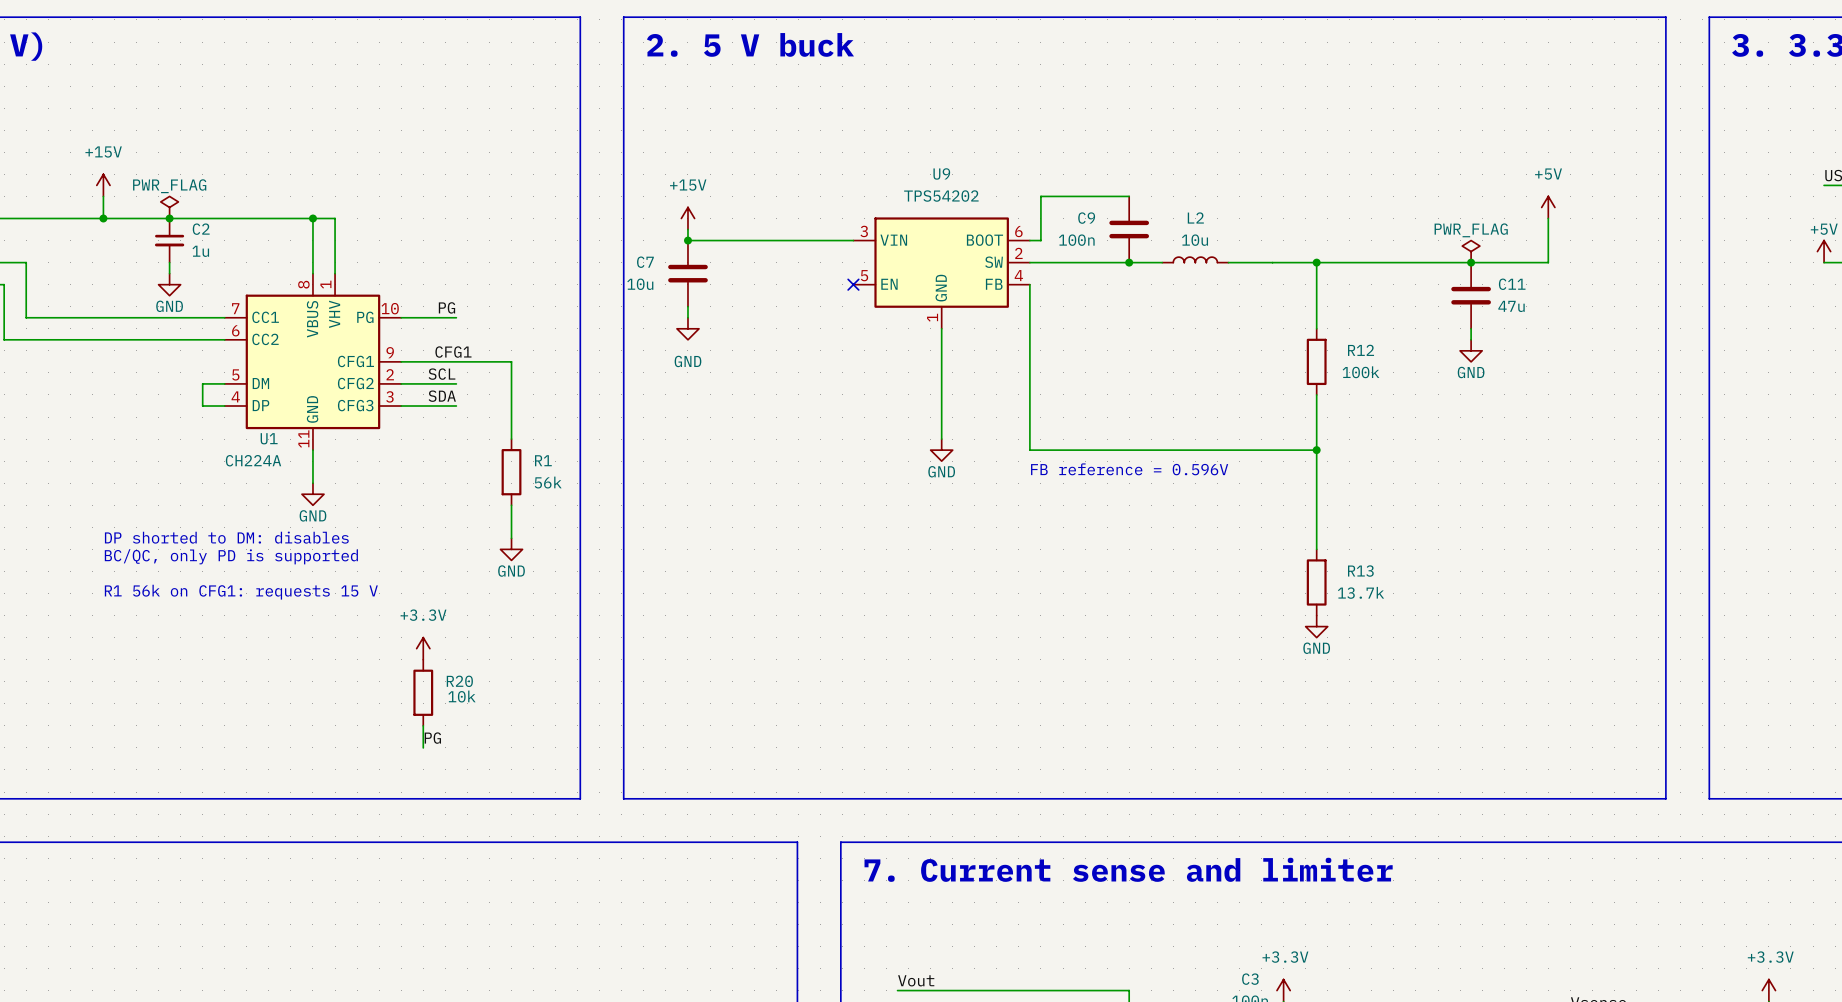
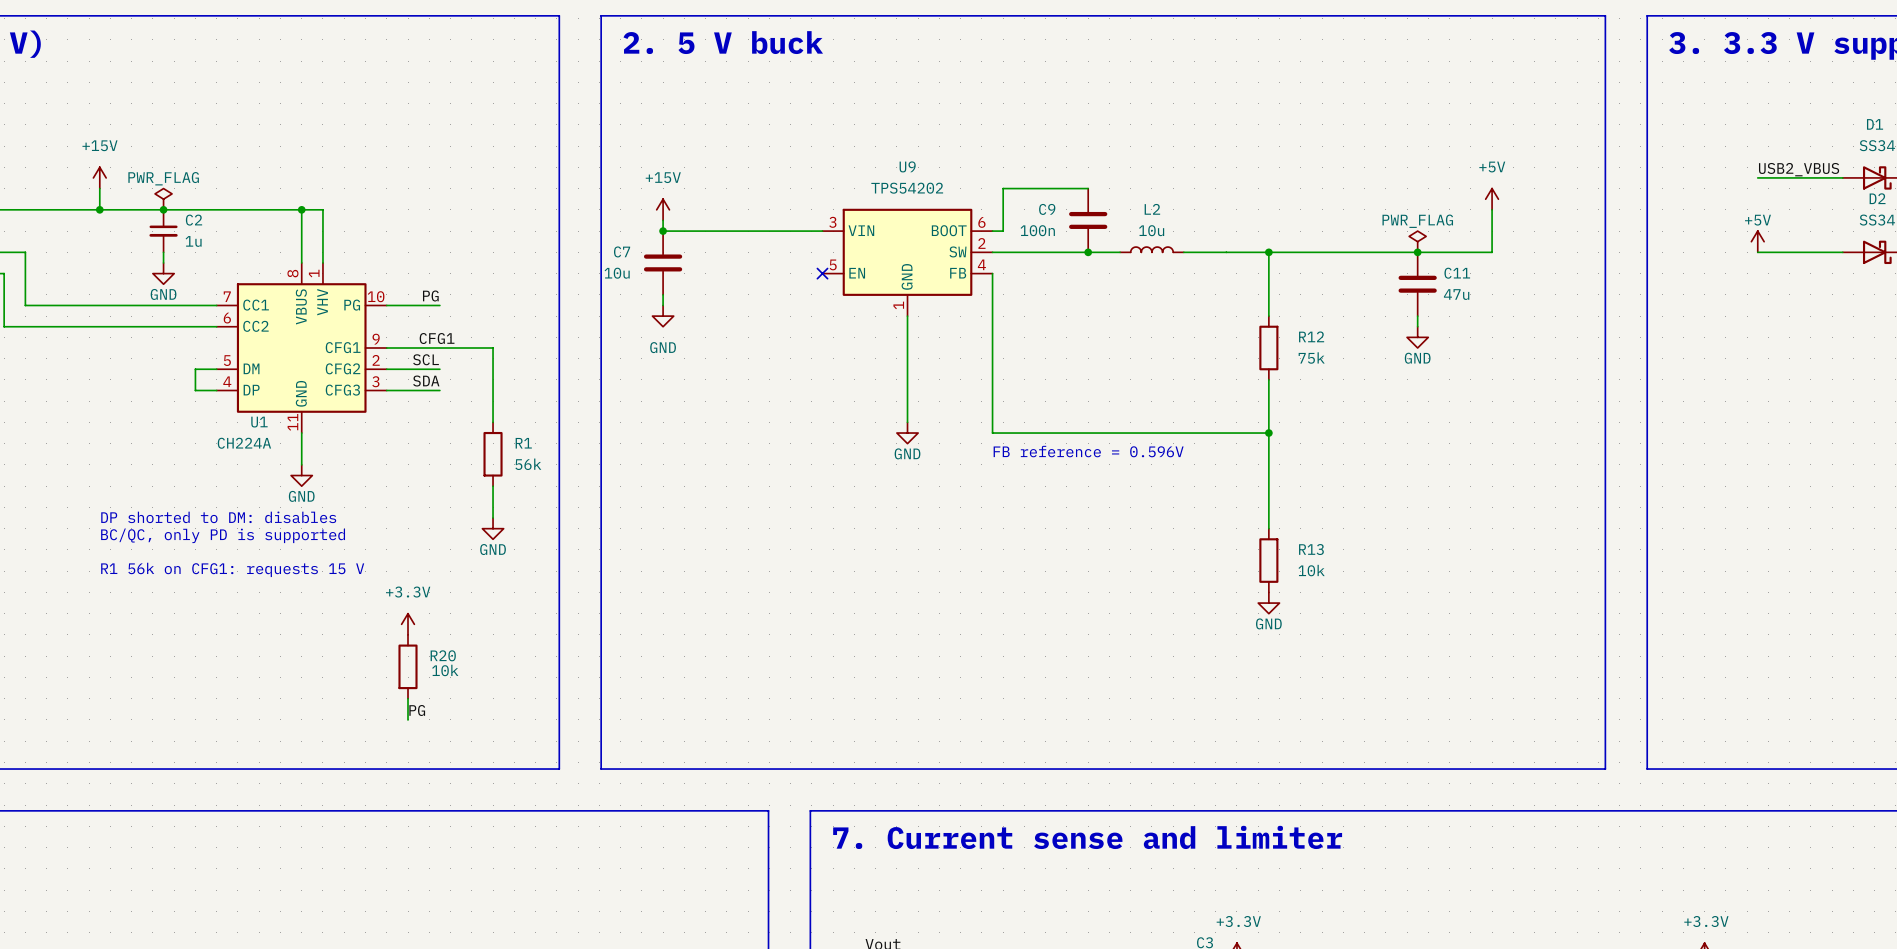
R12 value: 100k (1361, 372) -> 75k (1311, 358)
R13 value: 13.7k (1361, 592) -> 10k (1311, 570)

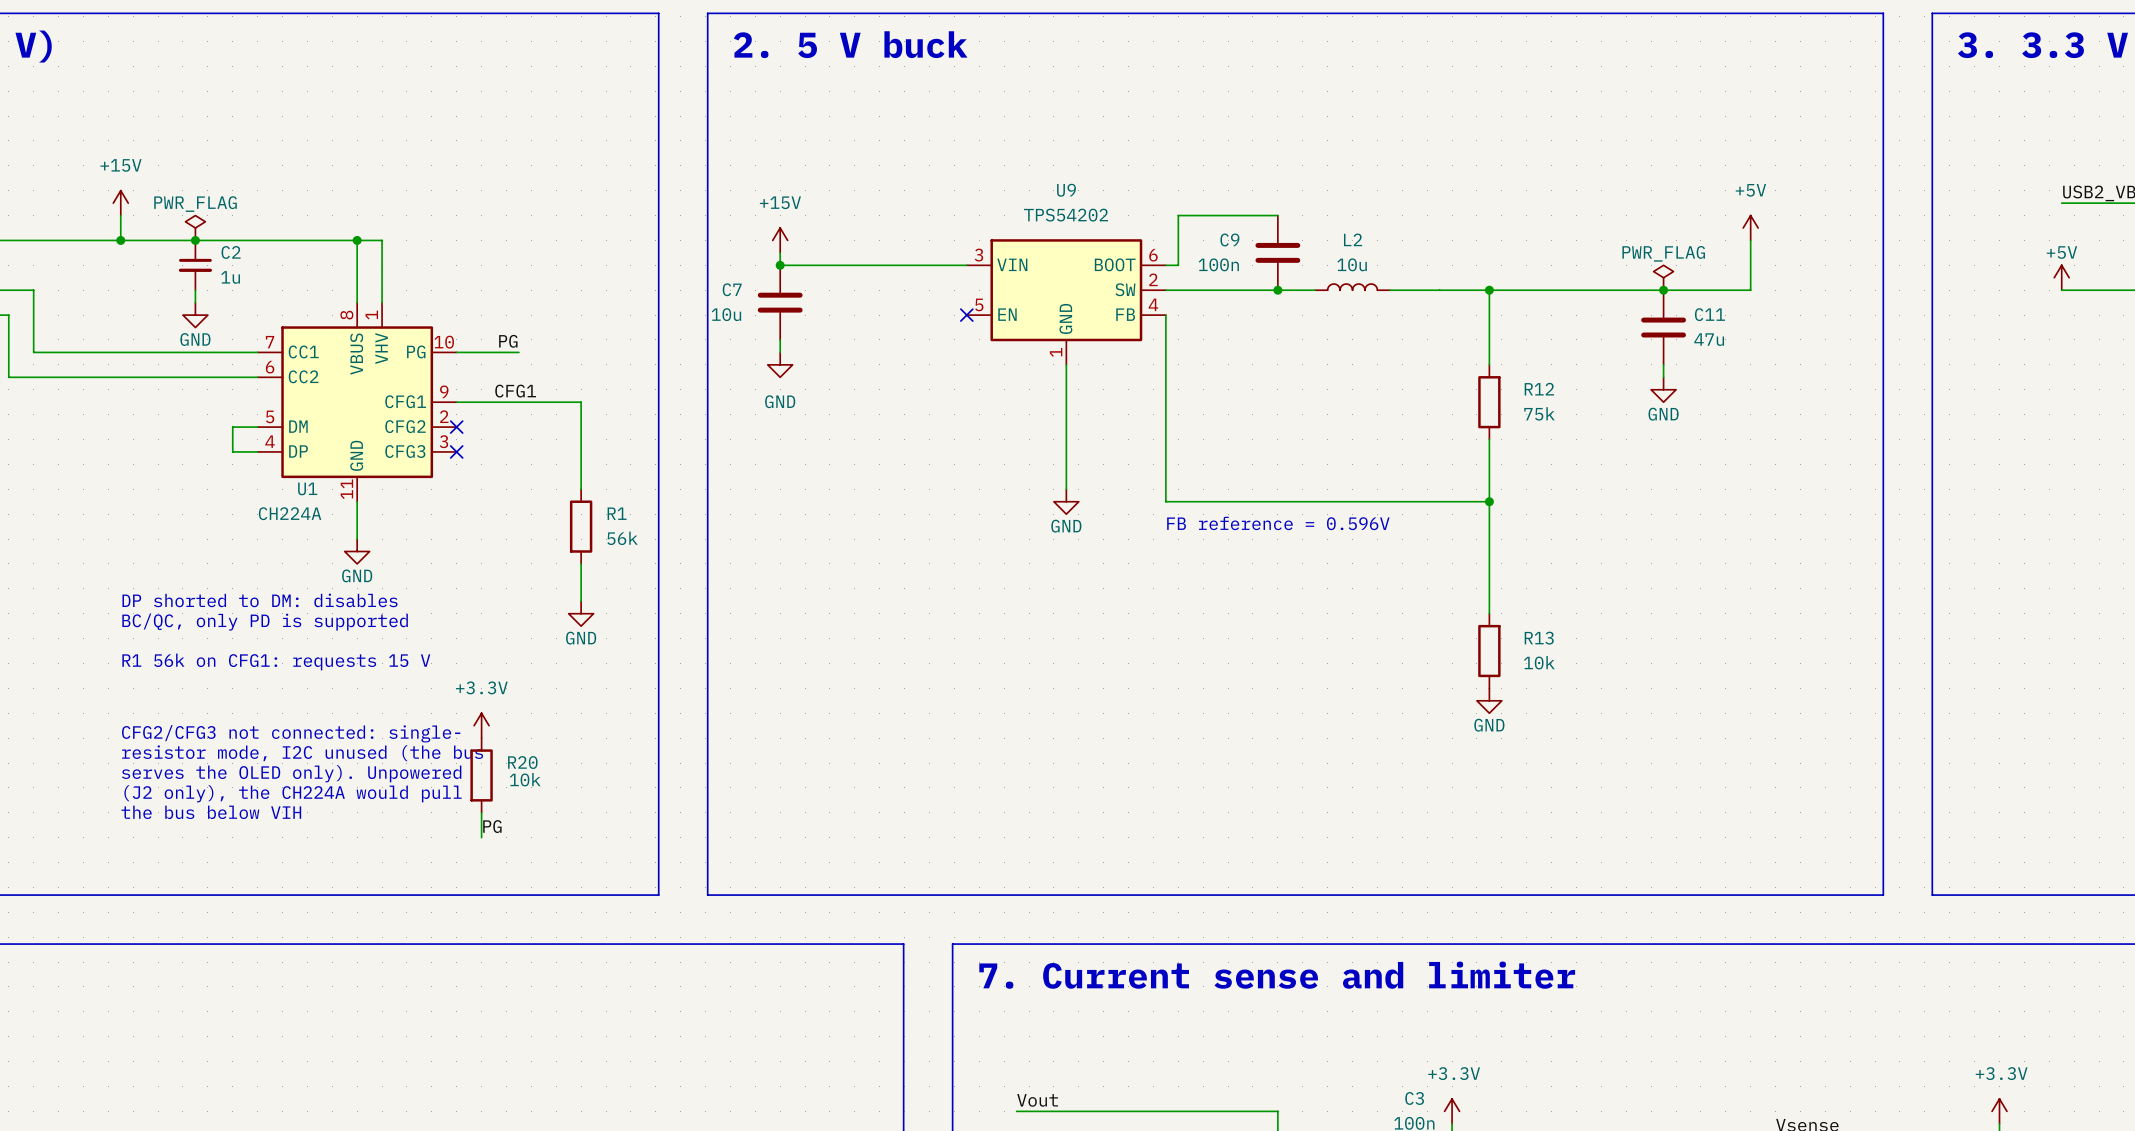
label: SCL (426, 359) -> none
wire: (386, 369) (439, 369) -> none
no-connect mark: none -> (456, 427)
label: SDA (426, 381) -> none
wire: (386, 390) (439, 390) -> none
no-connect mark: none -> (456, 451)
text: none -> CFG2/CFG3 not connected: single- (291, 733)
text: none -> resistor mode, I2C unused (the bus (302, 753)
text: none -> serves the OLED only). Unpowered (291, 773)
text: none -> (J2 only), the CH224A would pull (293, 793)
text: none -> the bus below VIH (211, 812)

